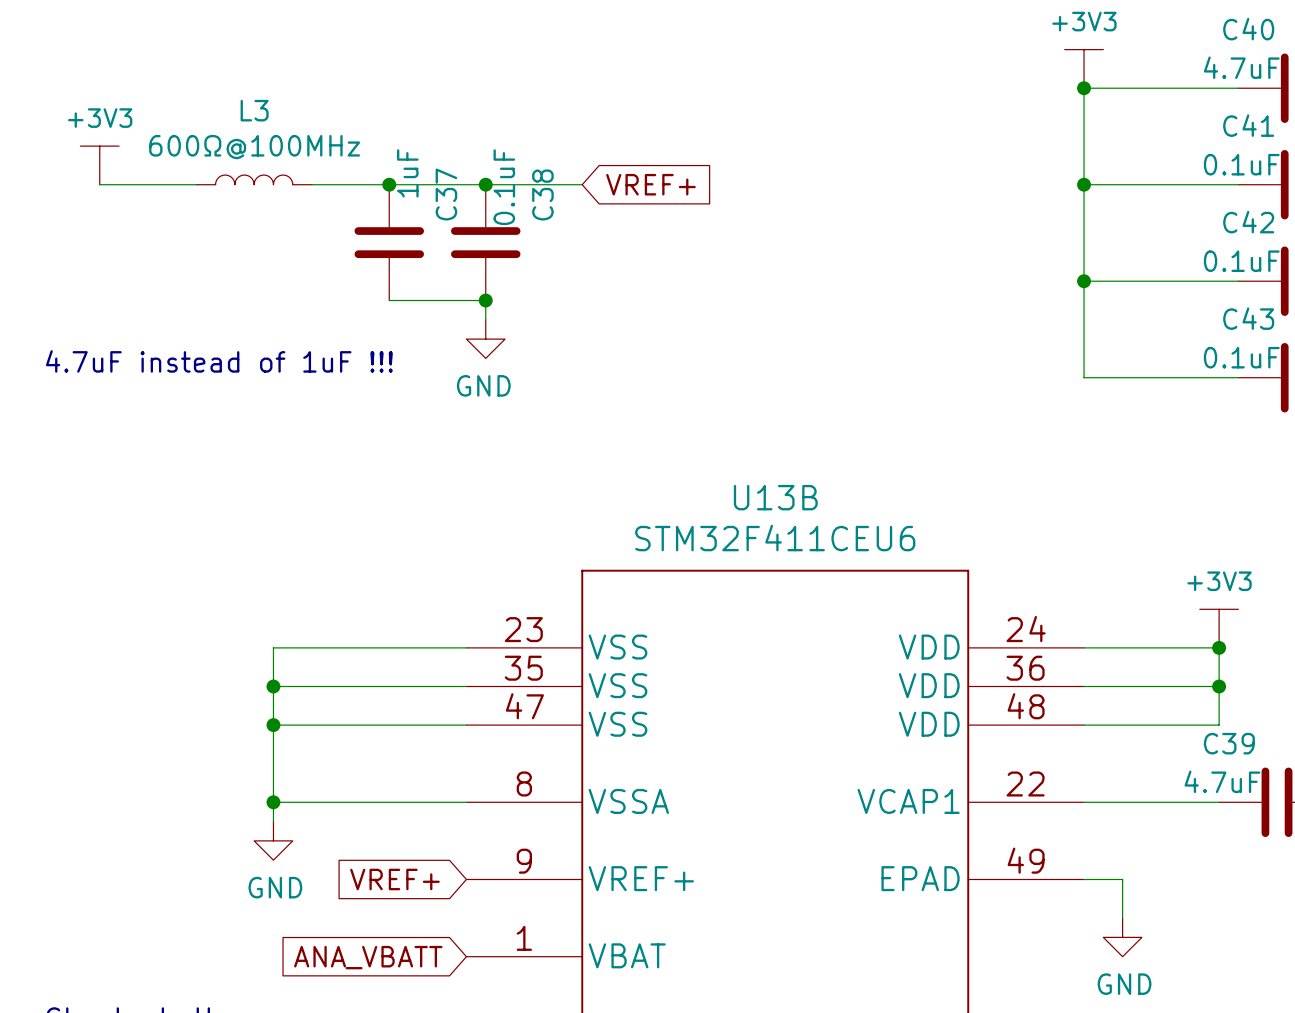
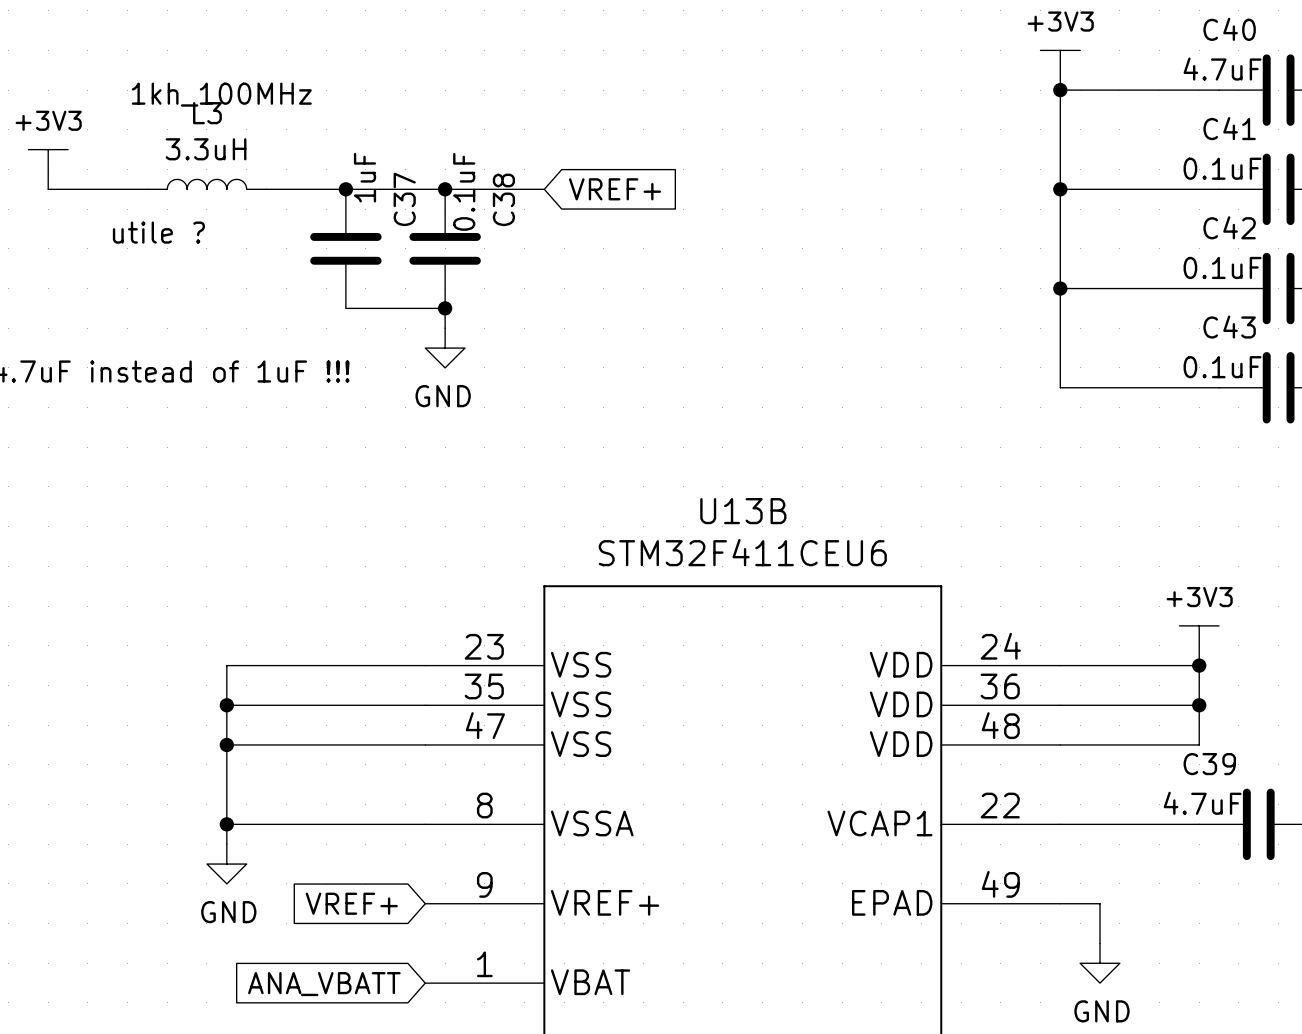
text: none -> 1kh_100MHz (221, 94)
L3 value: 600Ω@100MHz (254, 147) -> 3.3uH (206, 149)
text: none -> utile ? (158, 232)

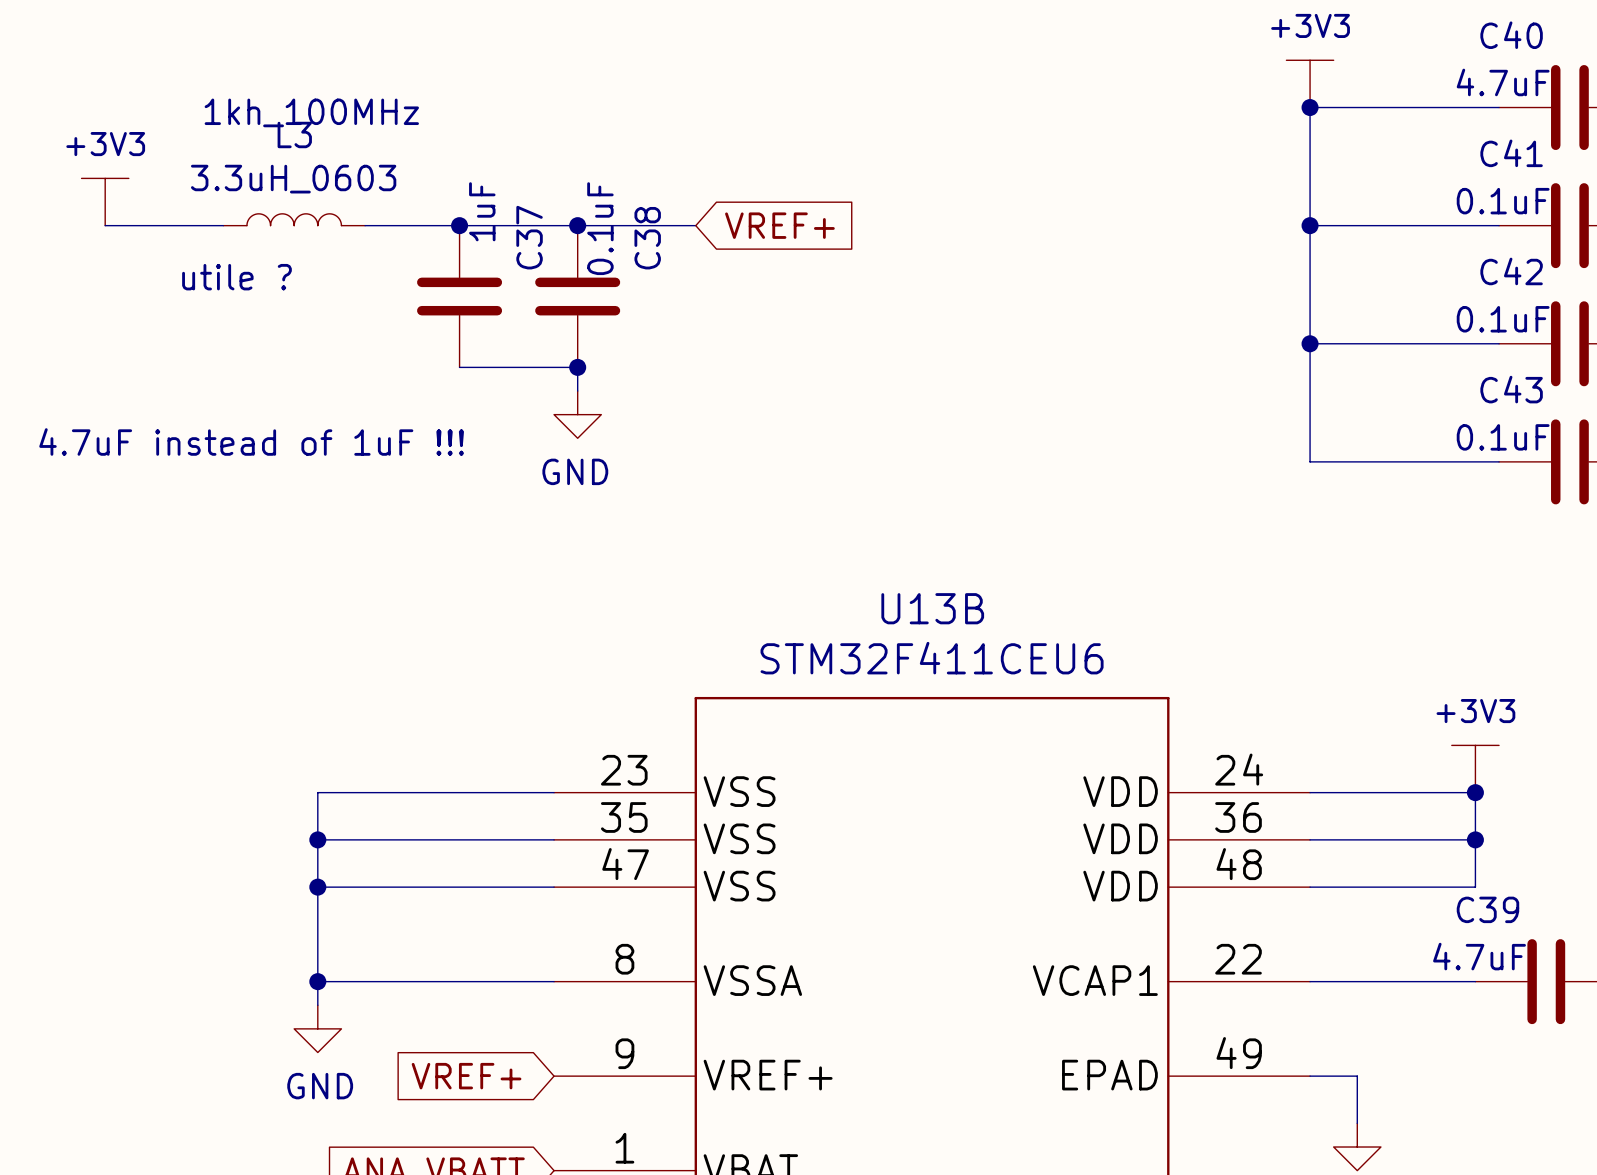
L3 value: 3.3uH (206, 149) -> 3.3uH_0603 (293, 179)

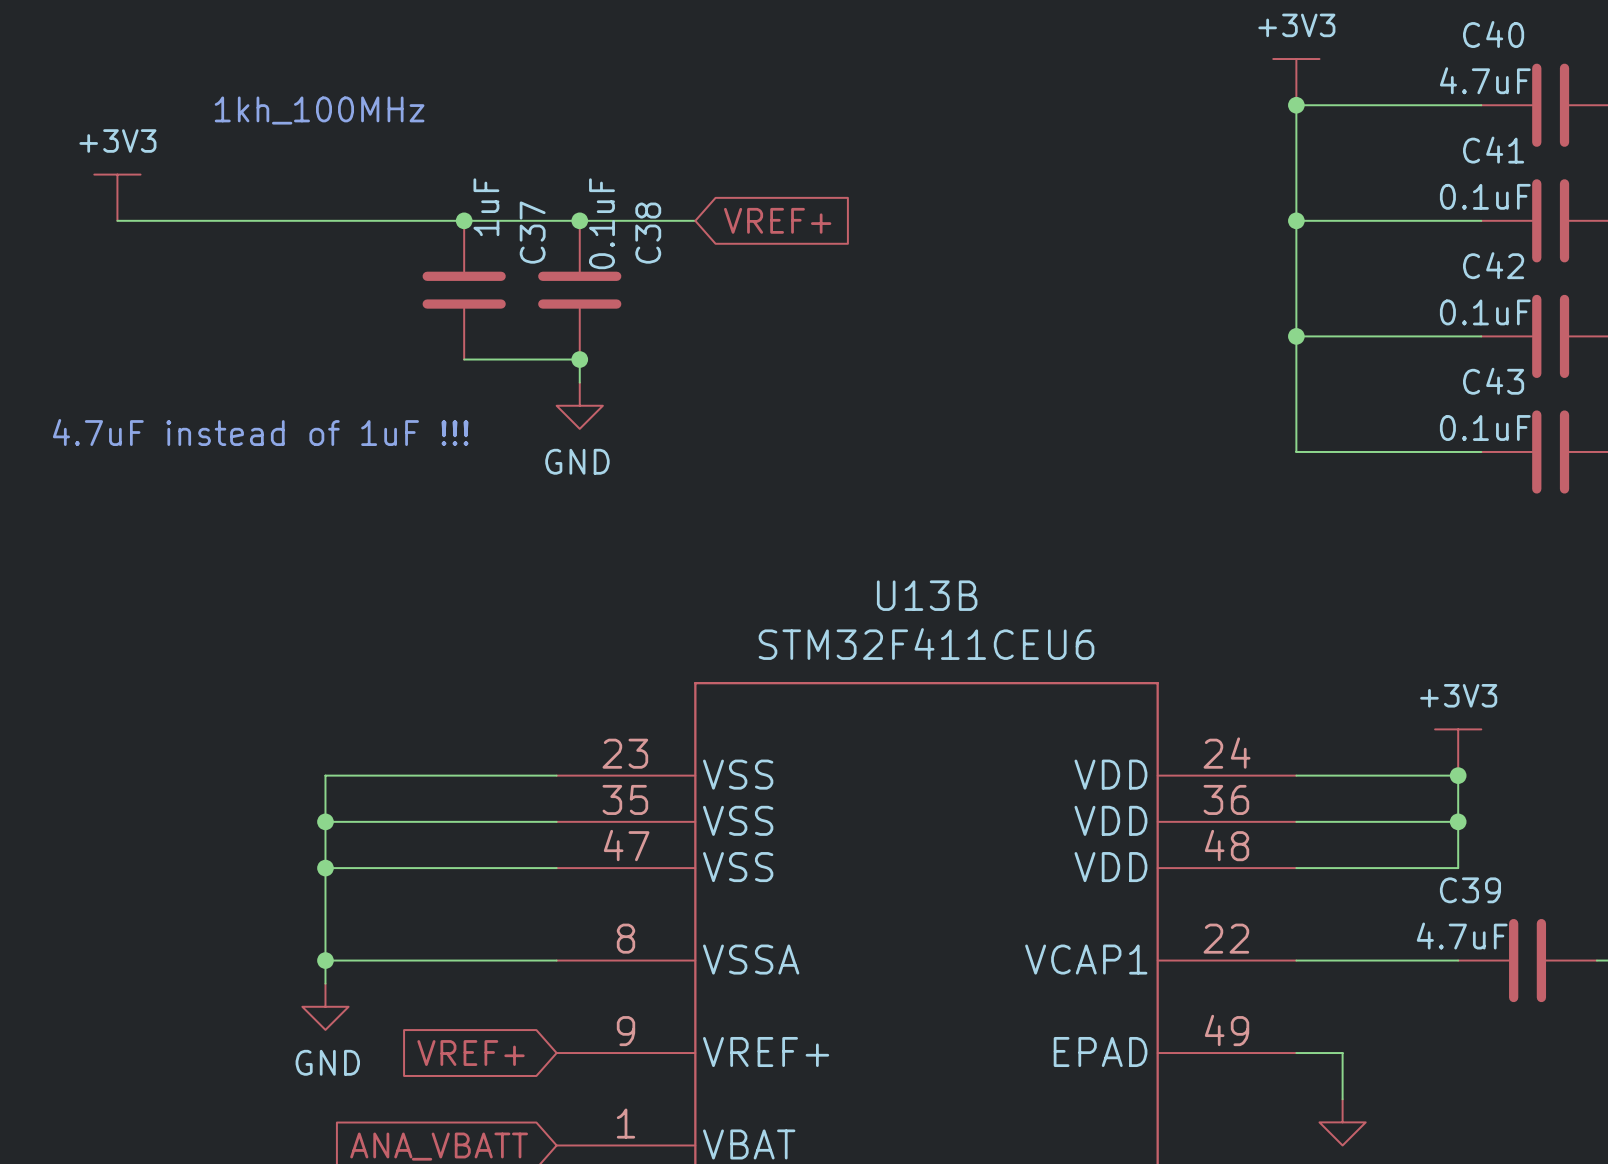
L3: 3.3uH_0603 (294, 219) -> none
wire: none -> (233, 220) (371, 220)
text: utile ? (236, 277) -> none

